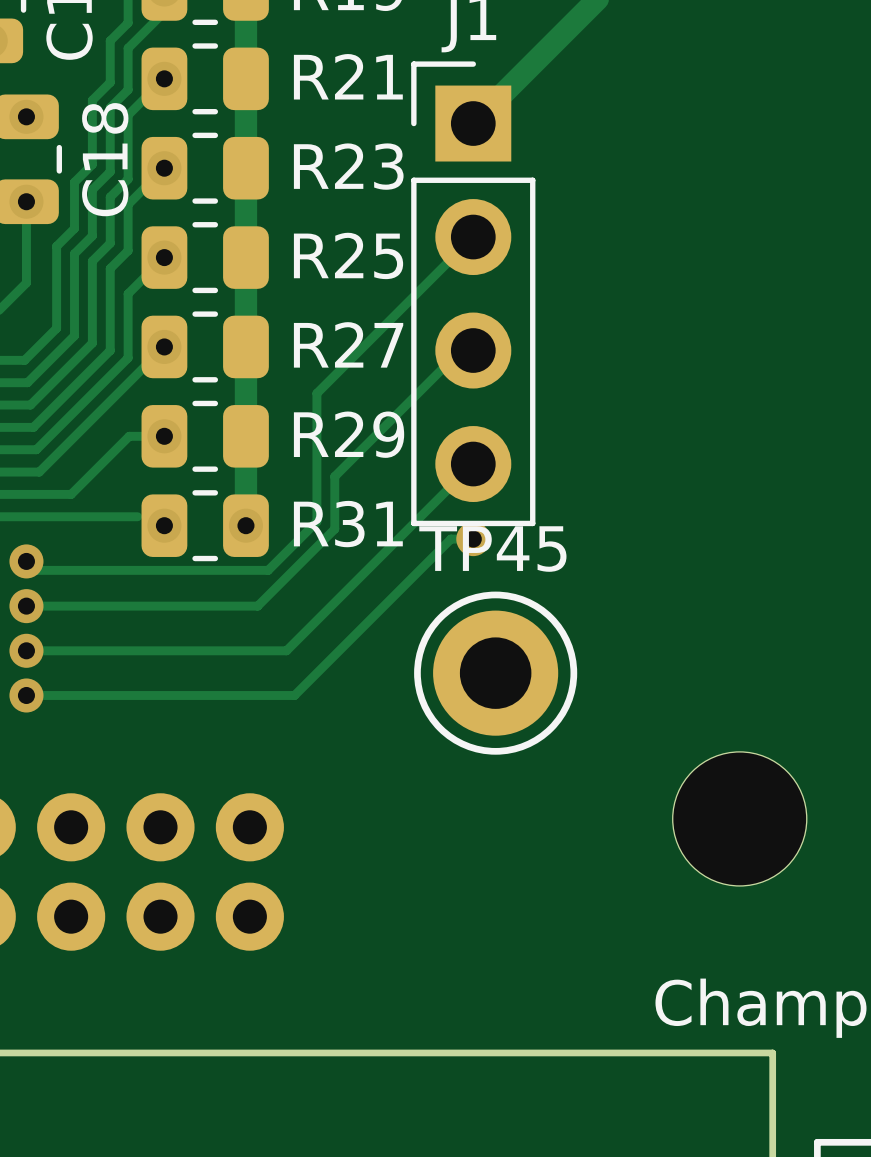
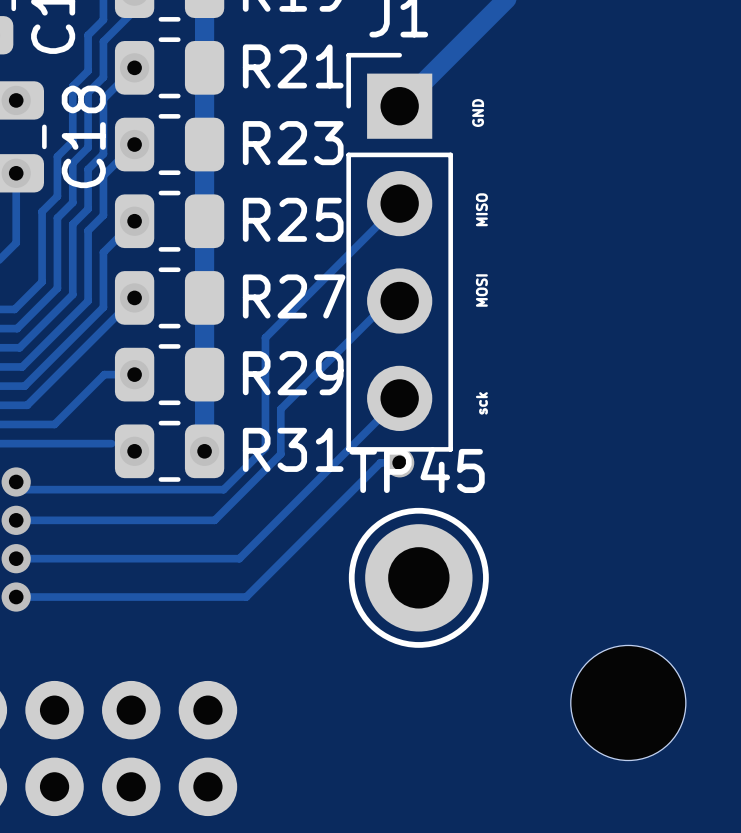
text: none -> GND (478, 113)
text: none -> MISO (481, 209)
text: none -> MOSI (481, 290)
text: none -> sck (481, 403)

